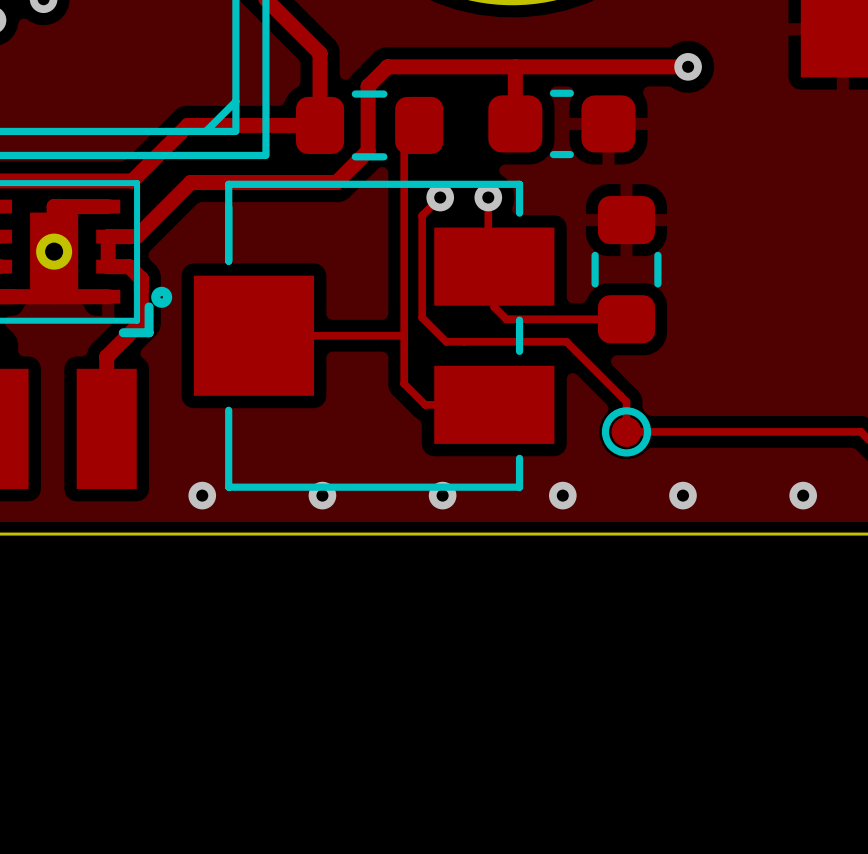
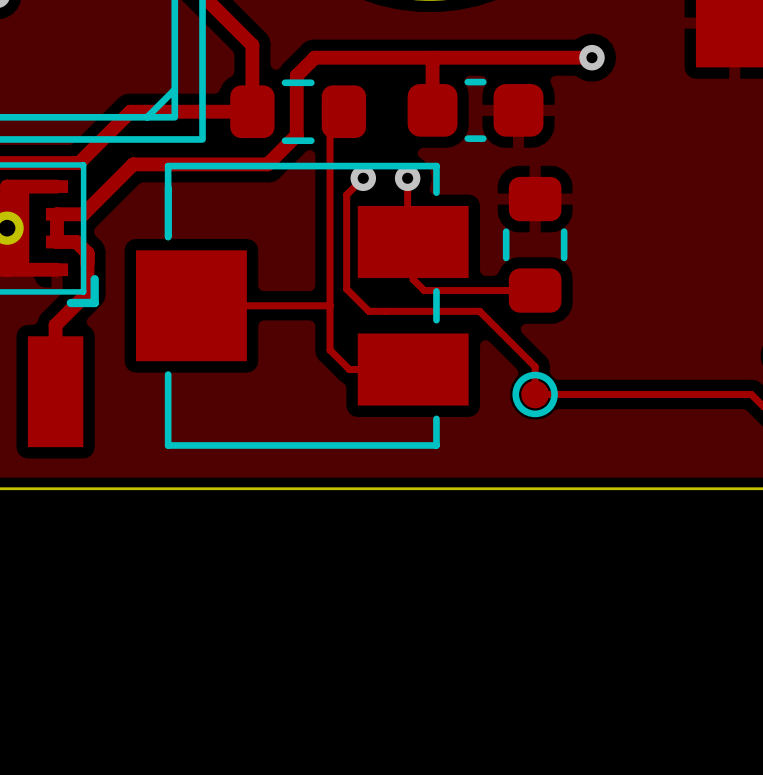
drawing: [151, 286, 173, 308] -> none
via: (202, 495) -> none
via: (322, 495) -> none
via: (442, 495) -> none
via: (562, 495) -> none
via: (682, 495) -> none
via: (803, 495) -> none

